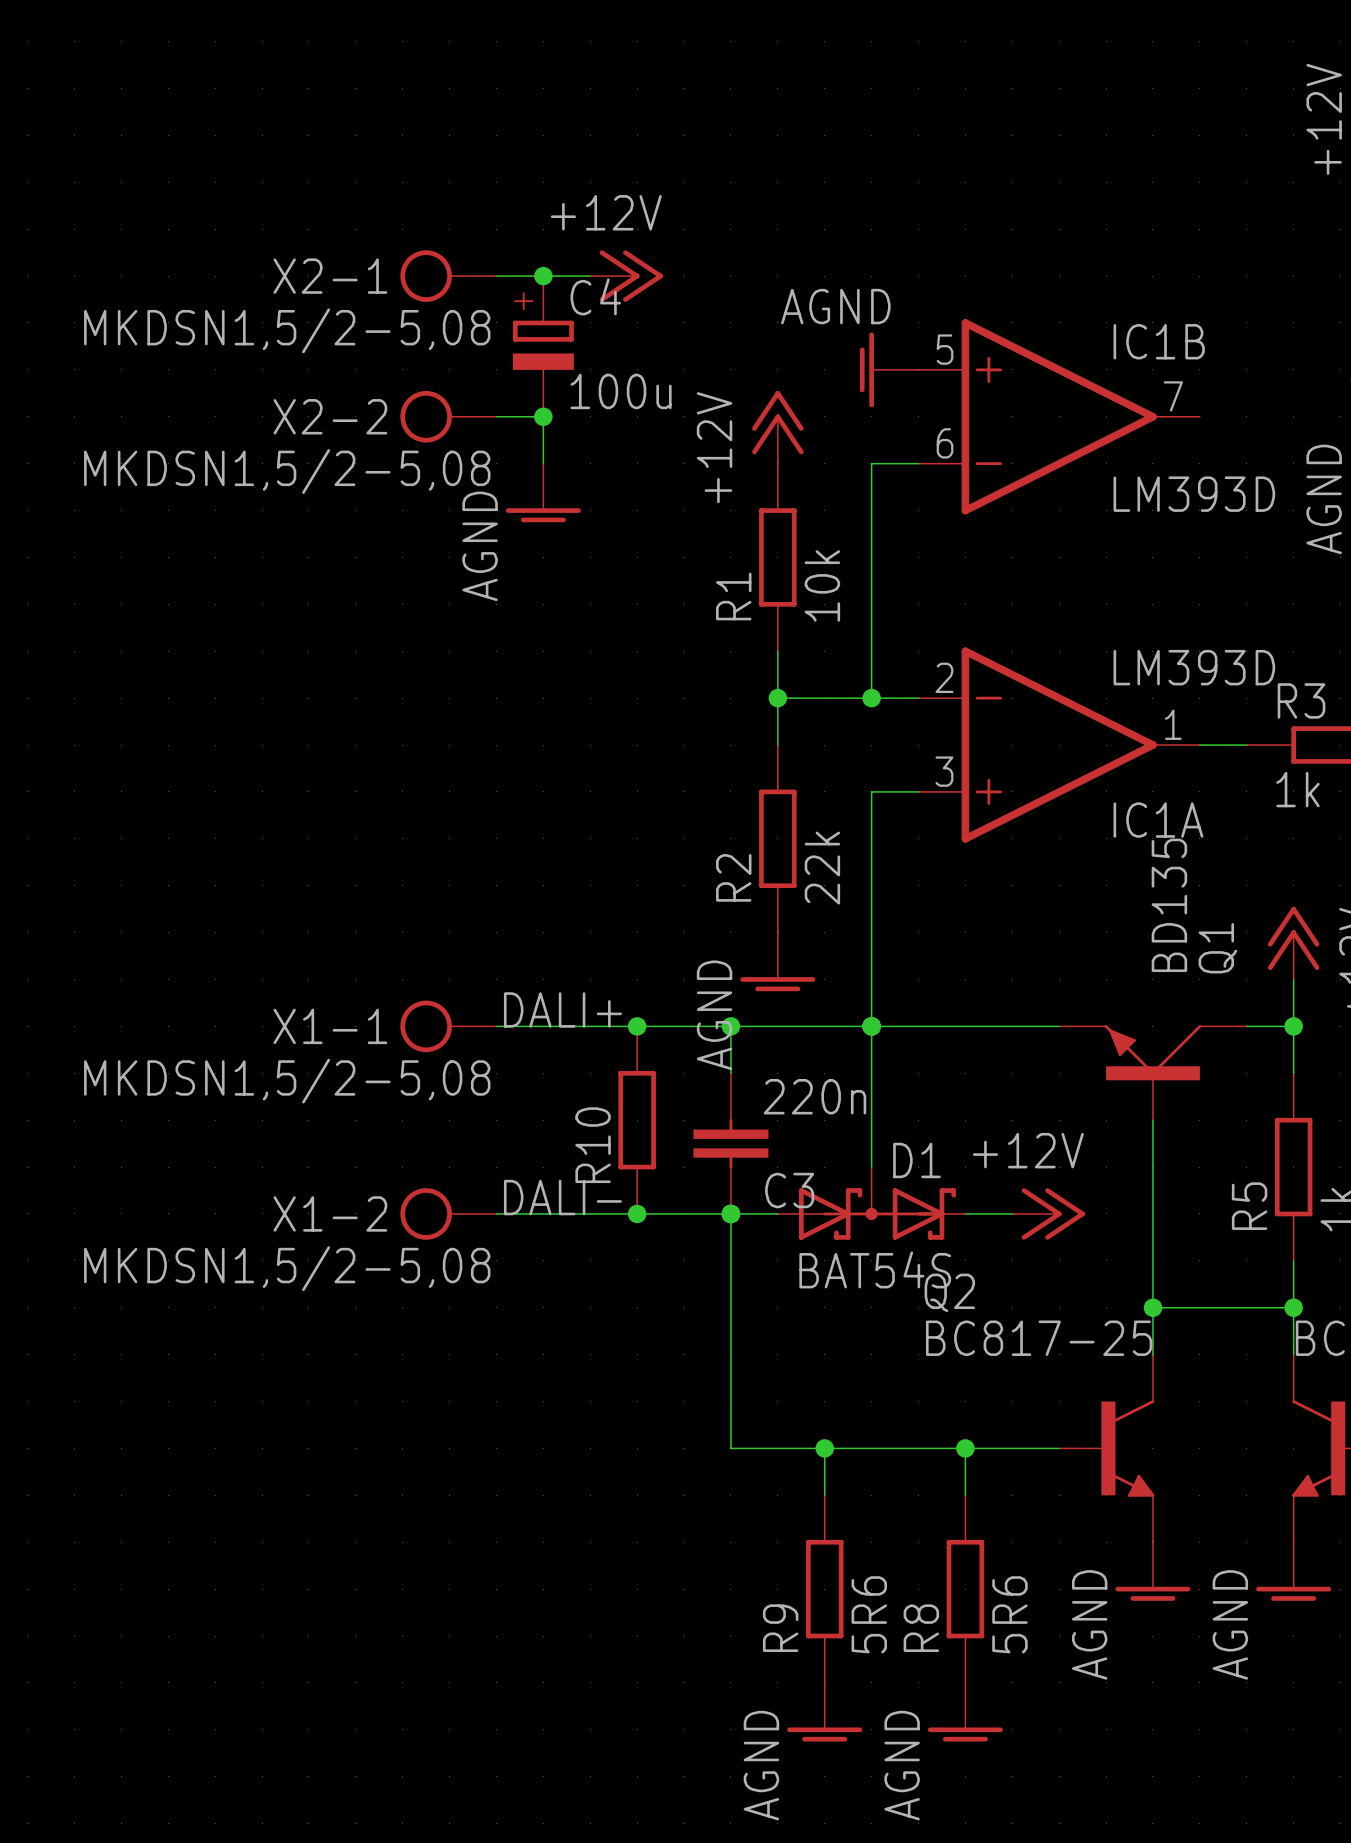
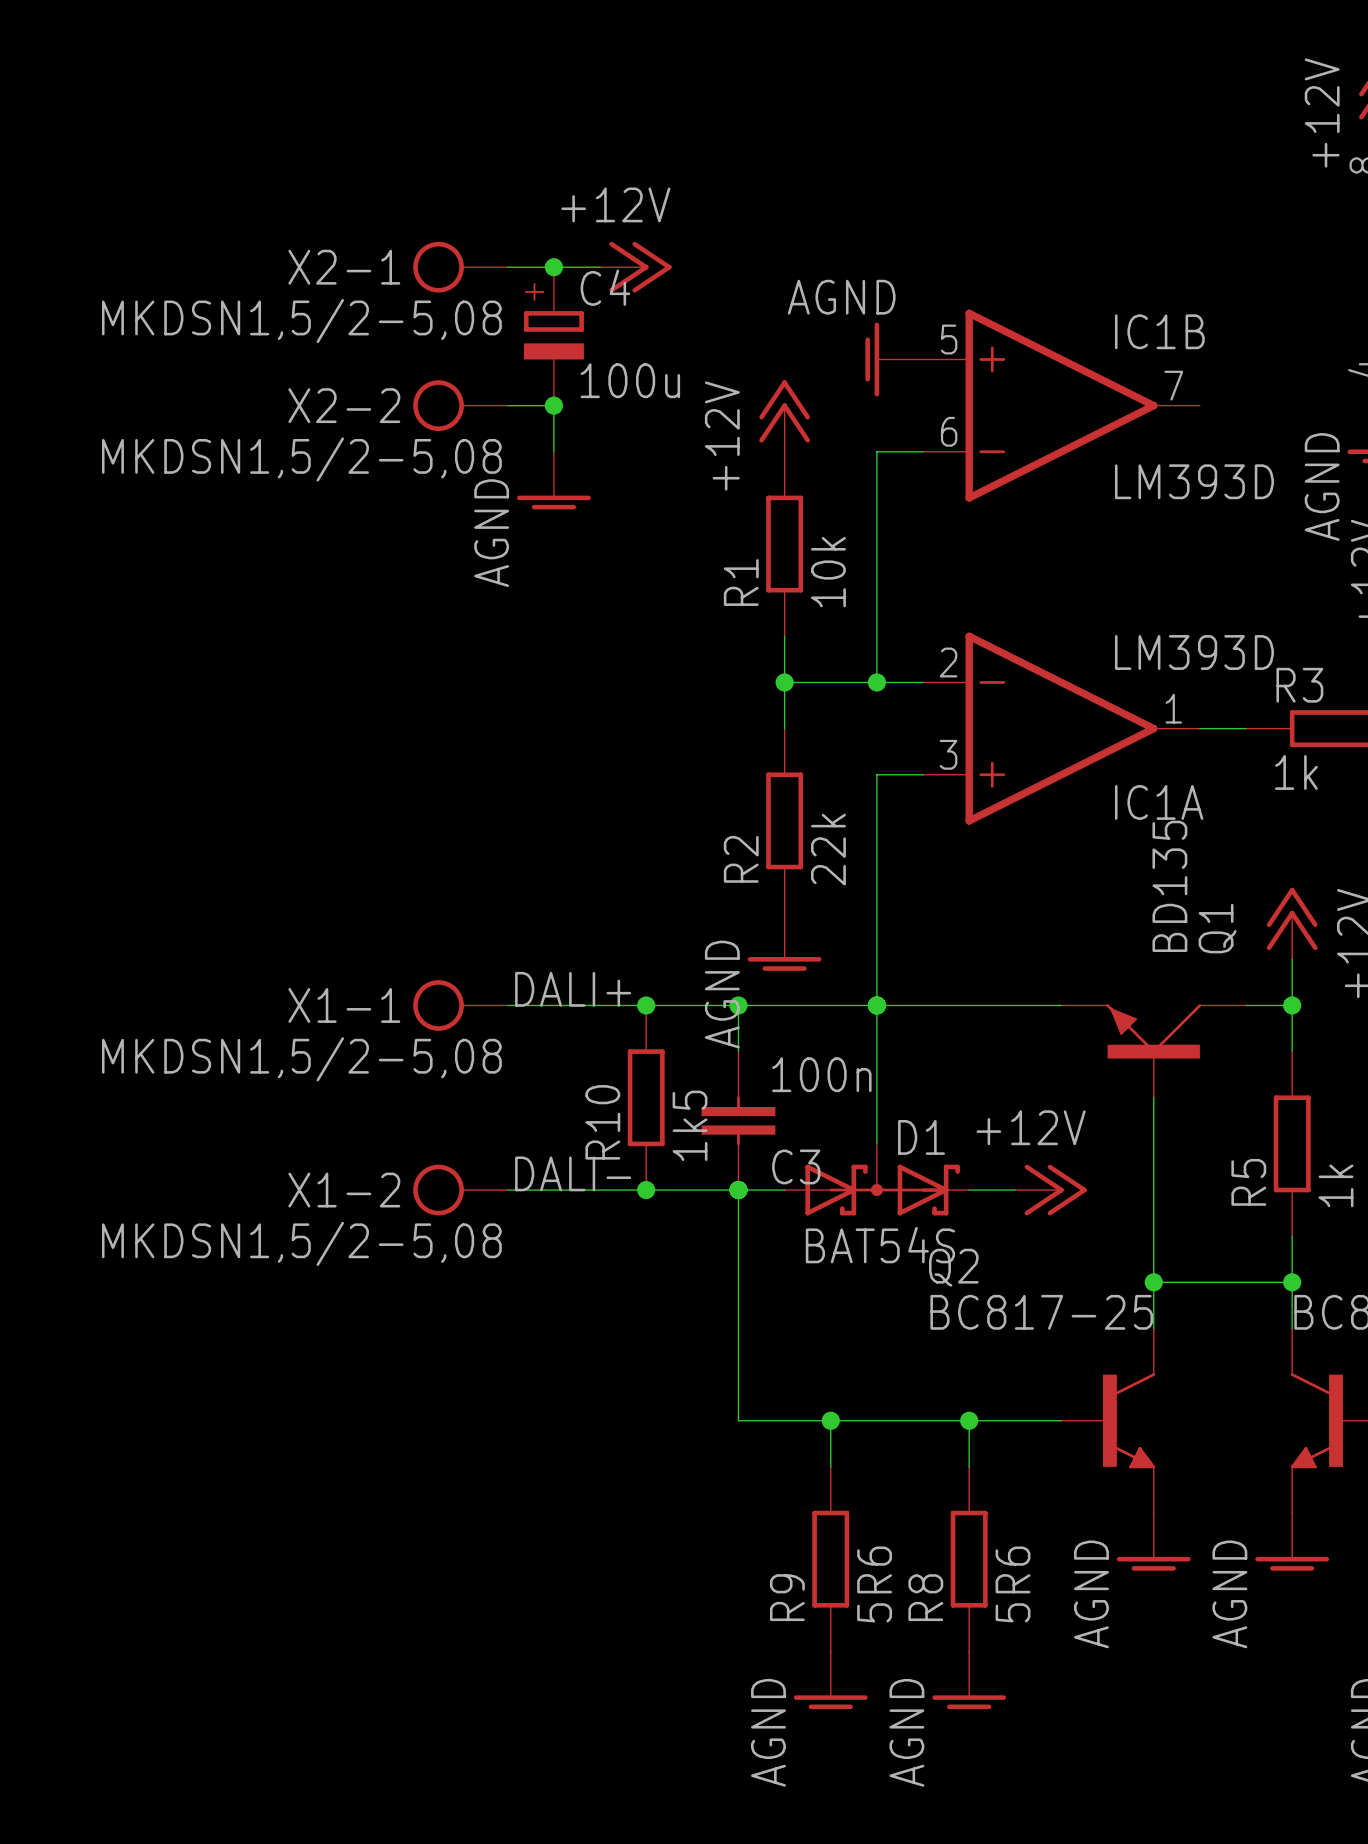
C3 value: 220n (814, 1096) -> 100n (821, 1074)
R10 value: none -> 1k5 (690, 1125)

